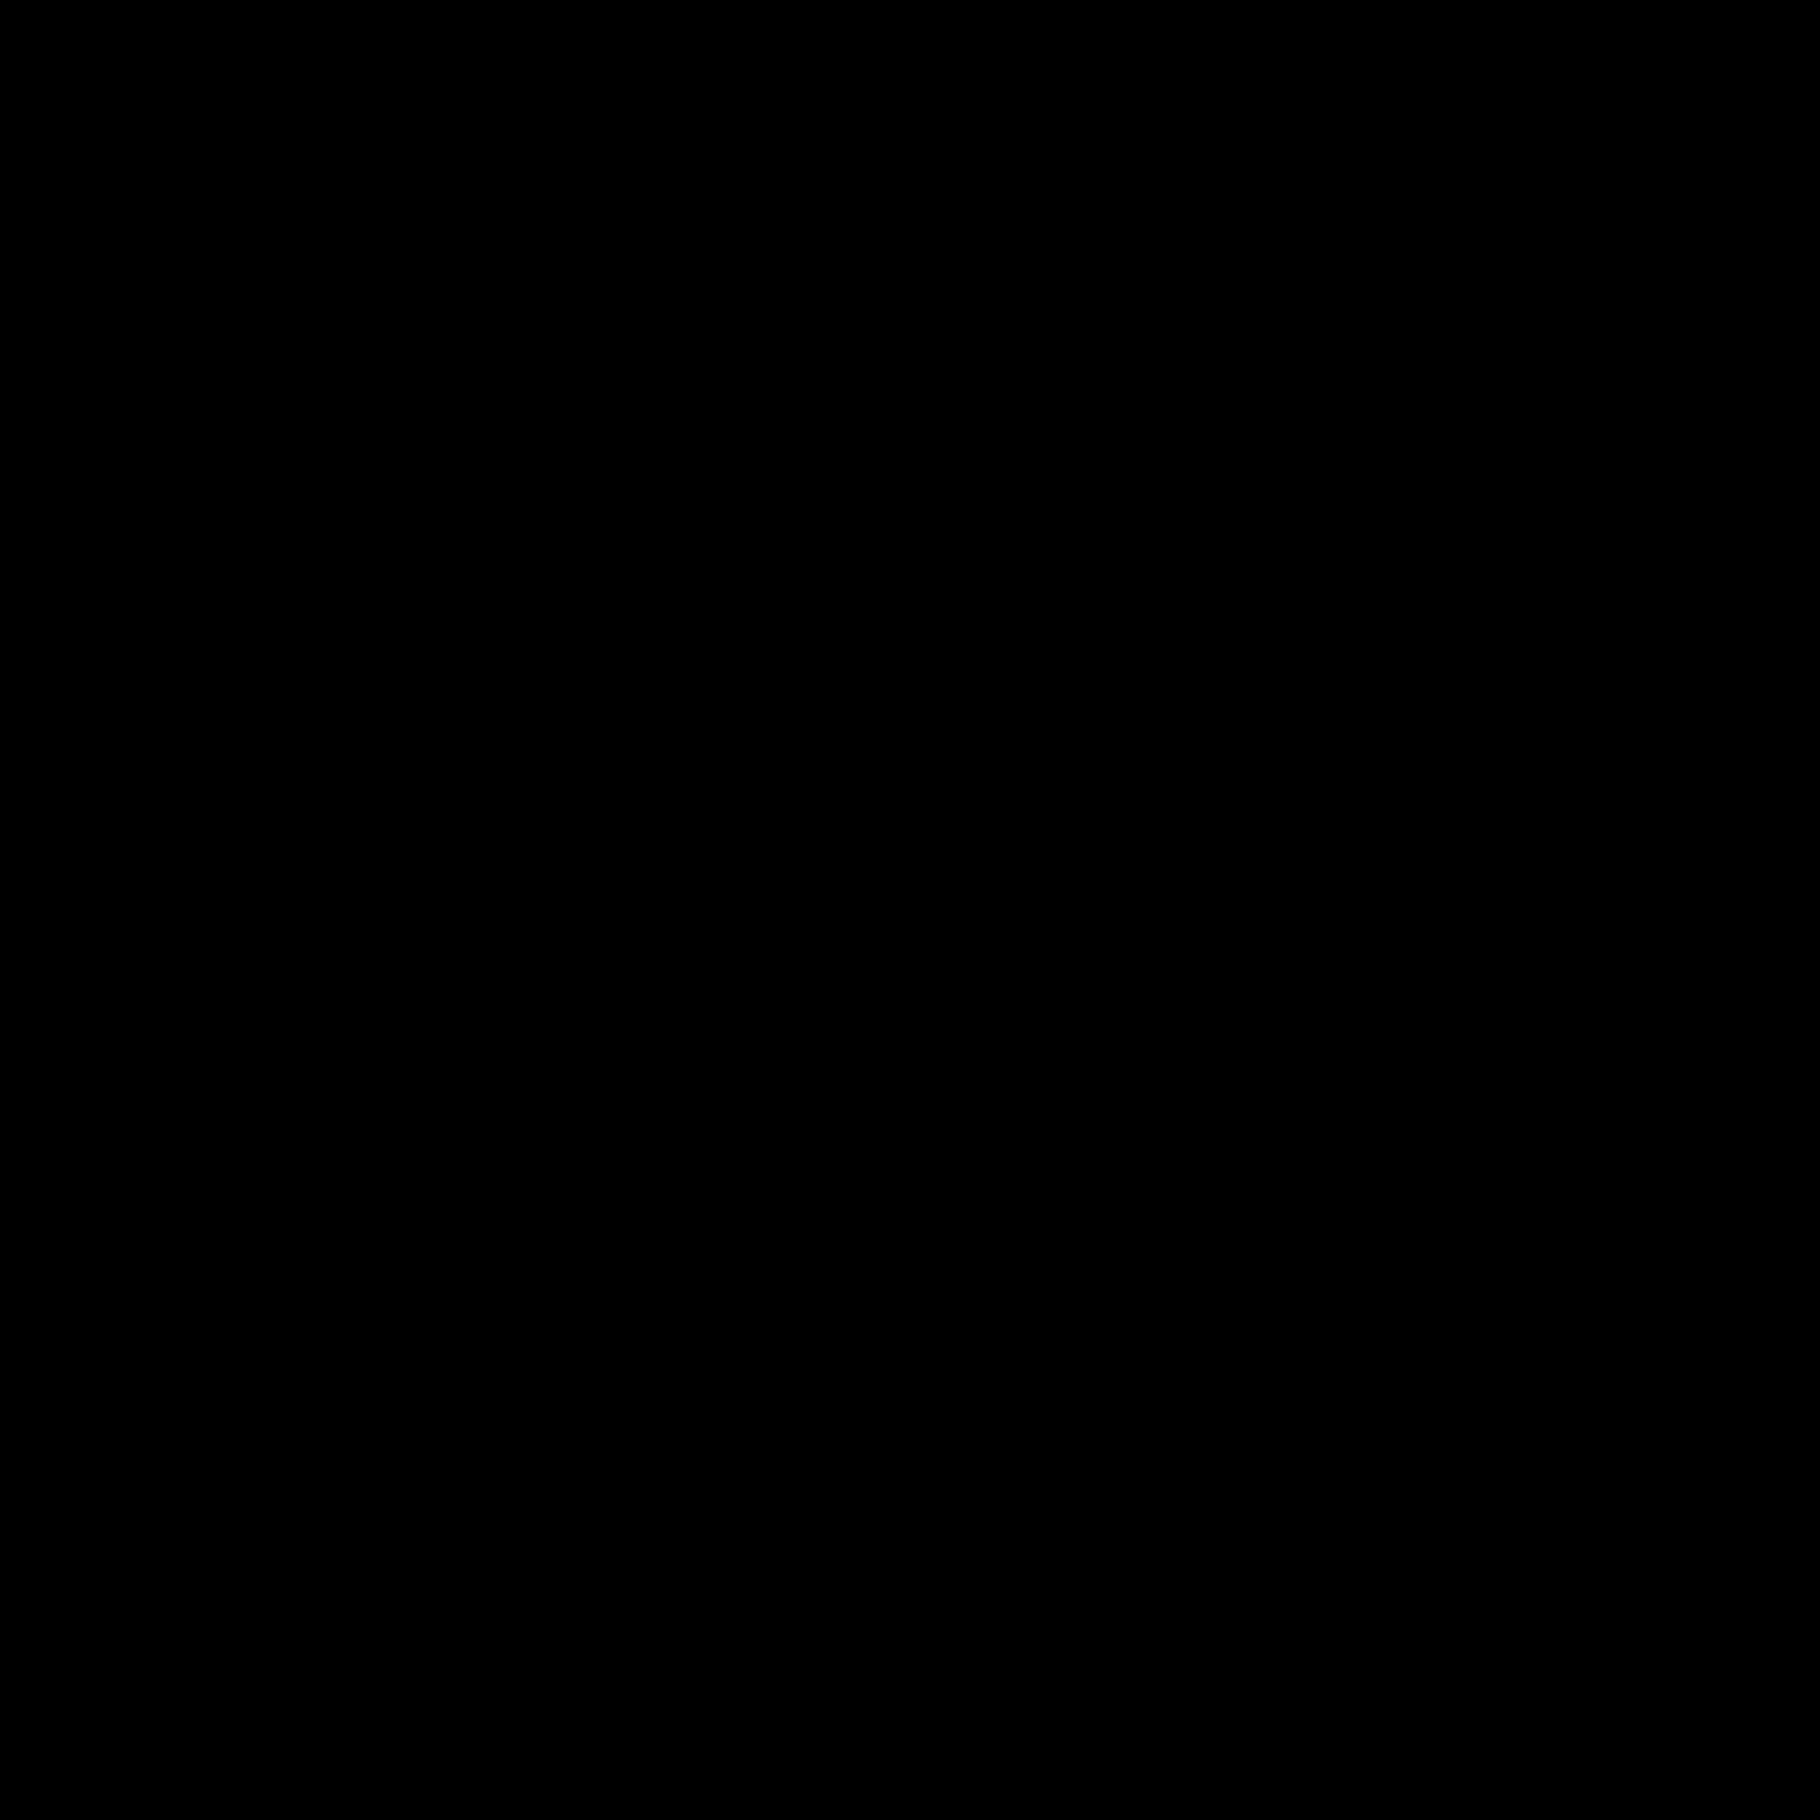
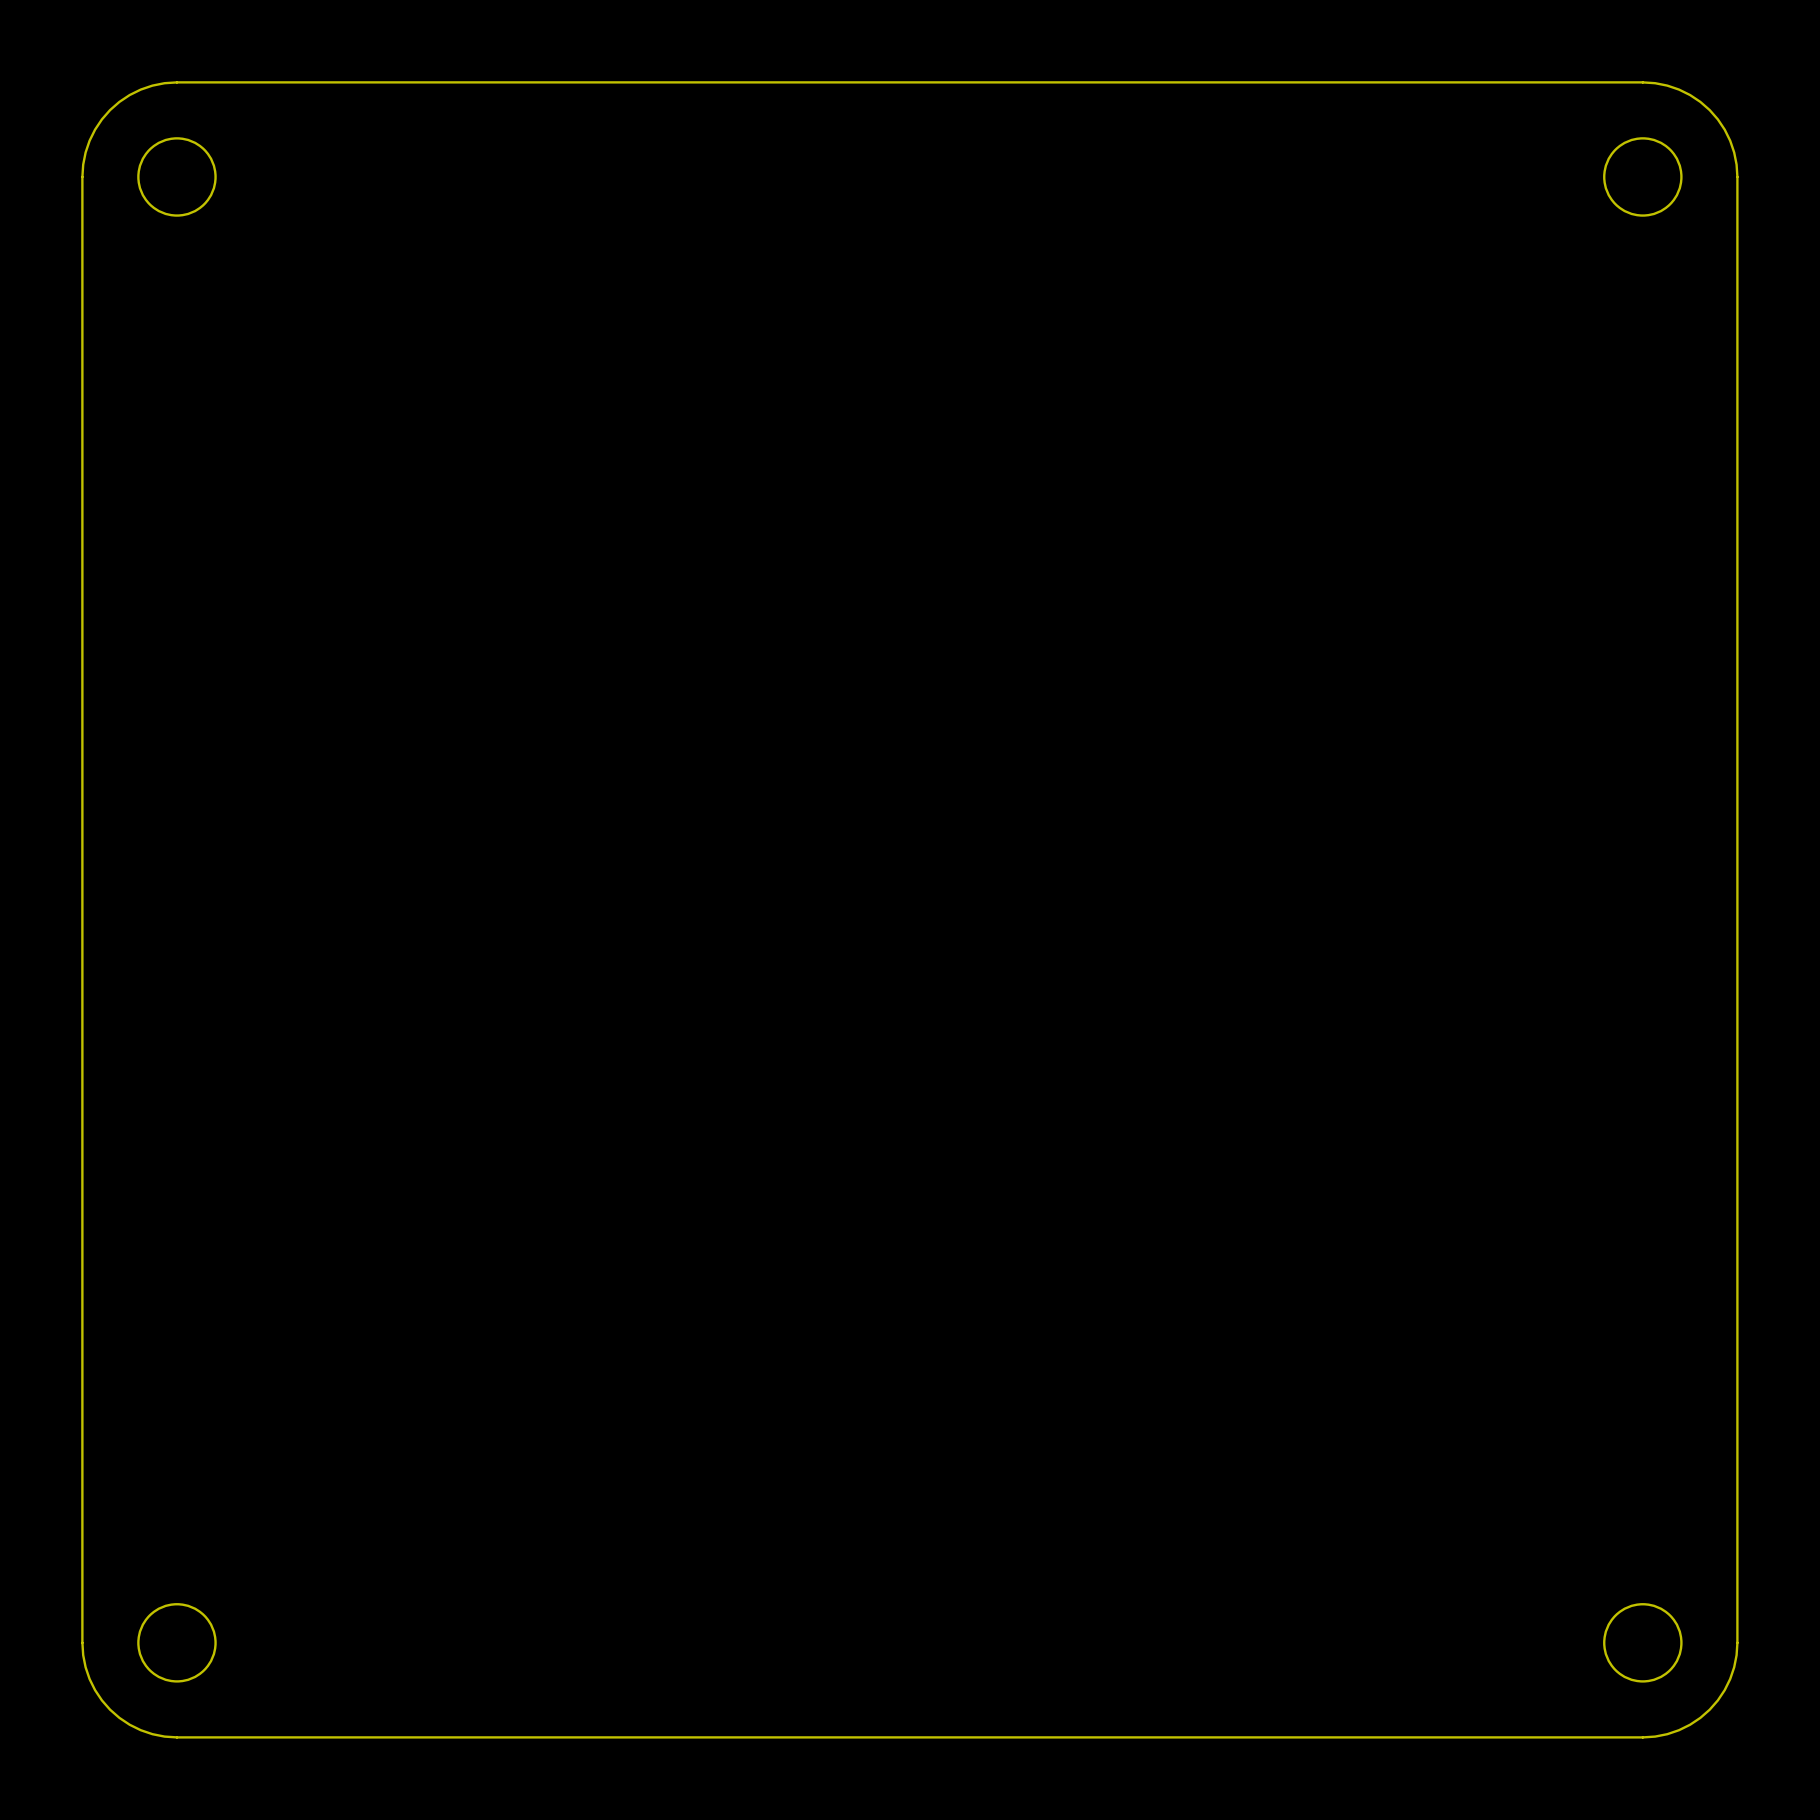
board edge: none -> (176, 82) (1642, 82) (1667, 85) (1679, 89) (1700, 101) (1709, 110) (1717, 119) (1730, 140) (1734, 152) (1737, 176) (1737, 1642) (1734, 1667) (1730, 1679) (1717, 1700) (1709, 1709) (1690, 1724) (1679, 1730) (1667, 1734) (1642, 1737) (176, 1737) (152, 1734) (140, 1730) (129, 1724) (110, 1709) (101, 1700) (89, 1679) (83, 1655) (82, 1642) (82, 176) (83, 164) (89, 140) (95, 129) (110, 110) (119, 101) (140, 89) (152, 85) (176, 82)
round board edge: none -> [137, 137, 217, 217]
round board edge: none -> [1603, 137, 1683, 217]
round board edge: none -> [137, 1603, 217, 1683]
round board edge: none -> [1603, 1603, 1683, 1683]

